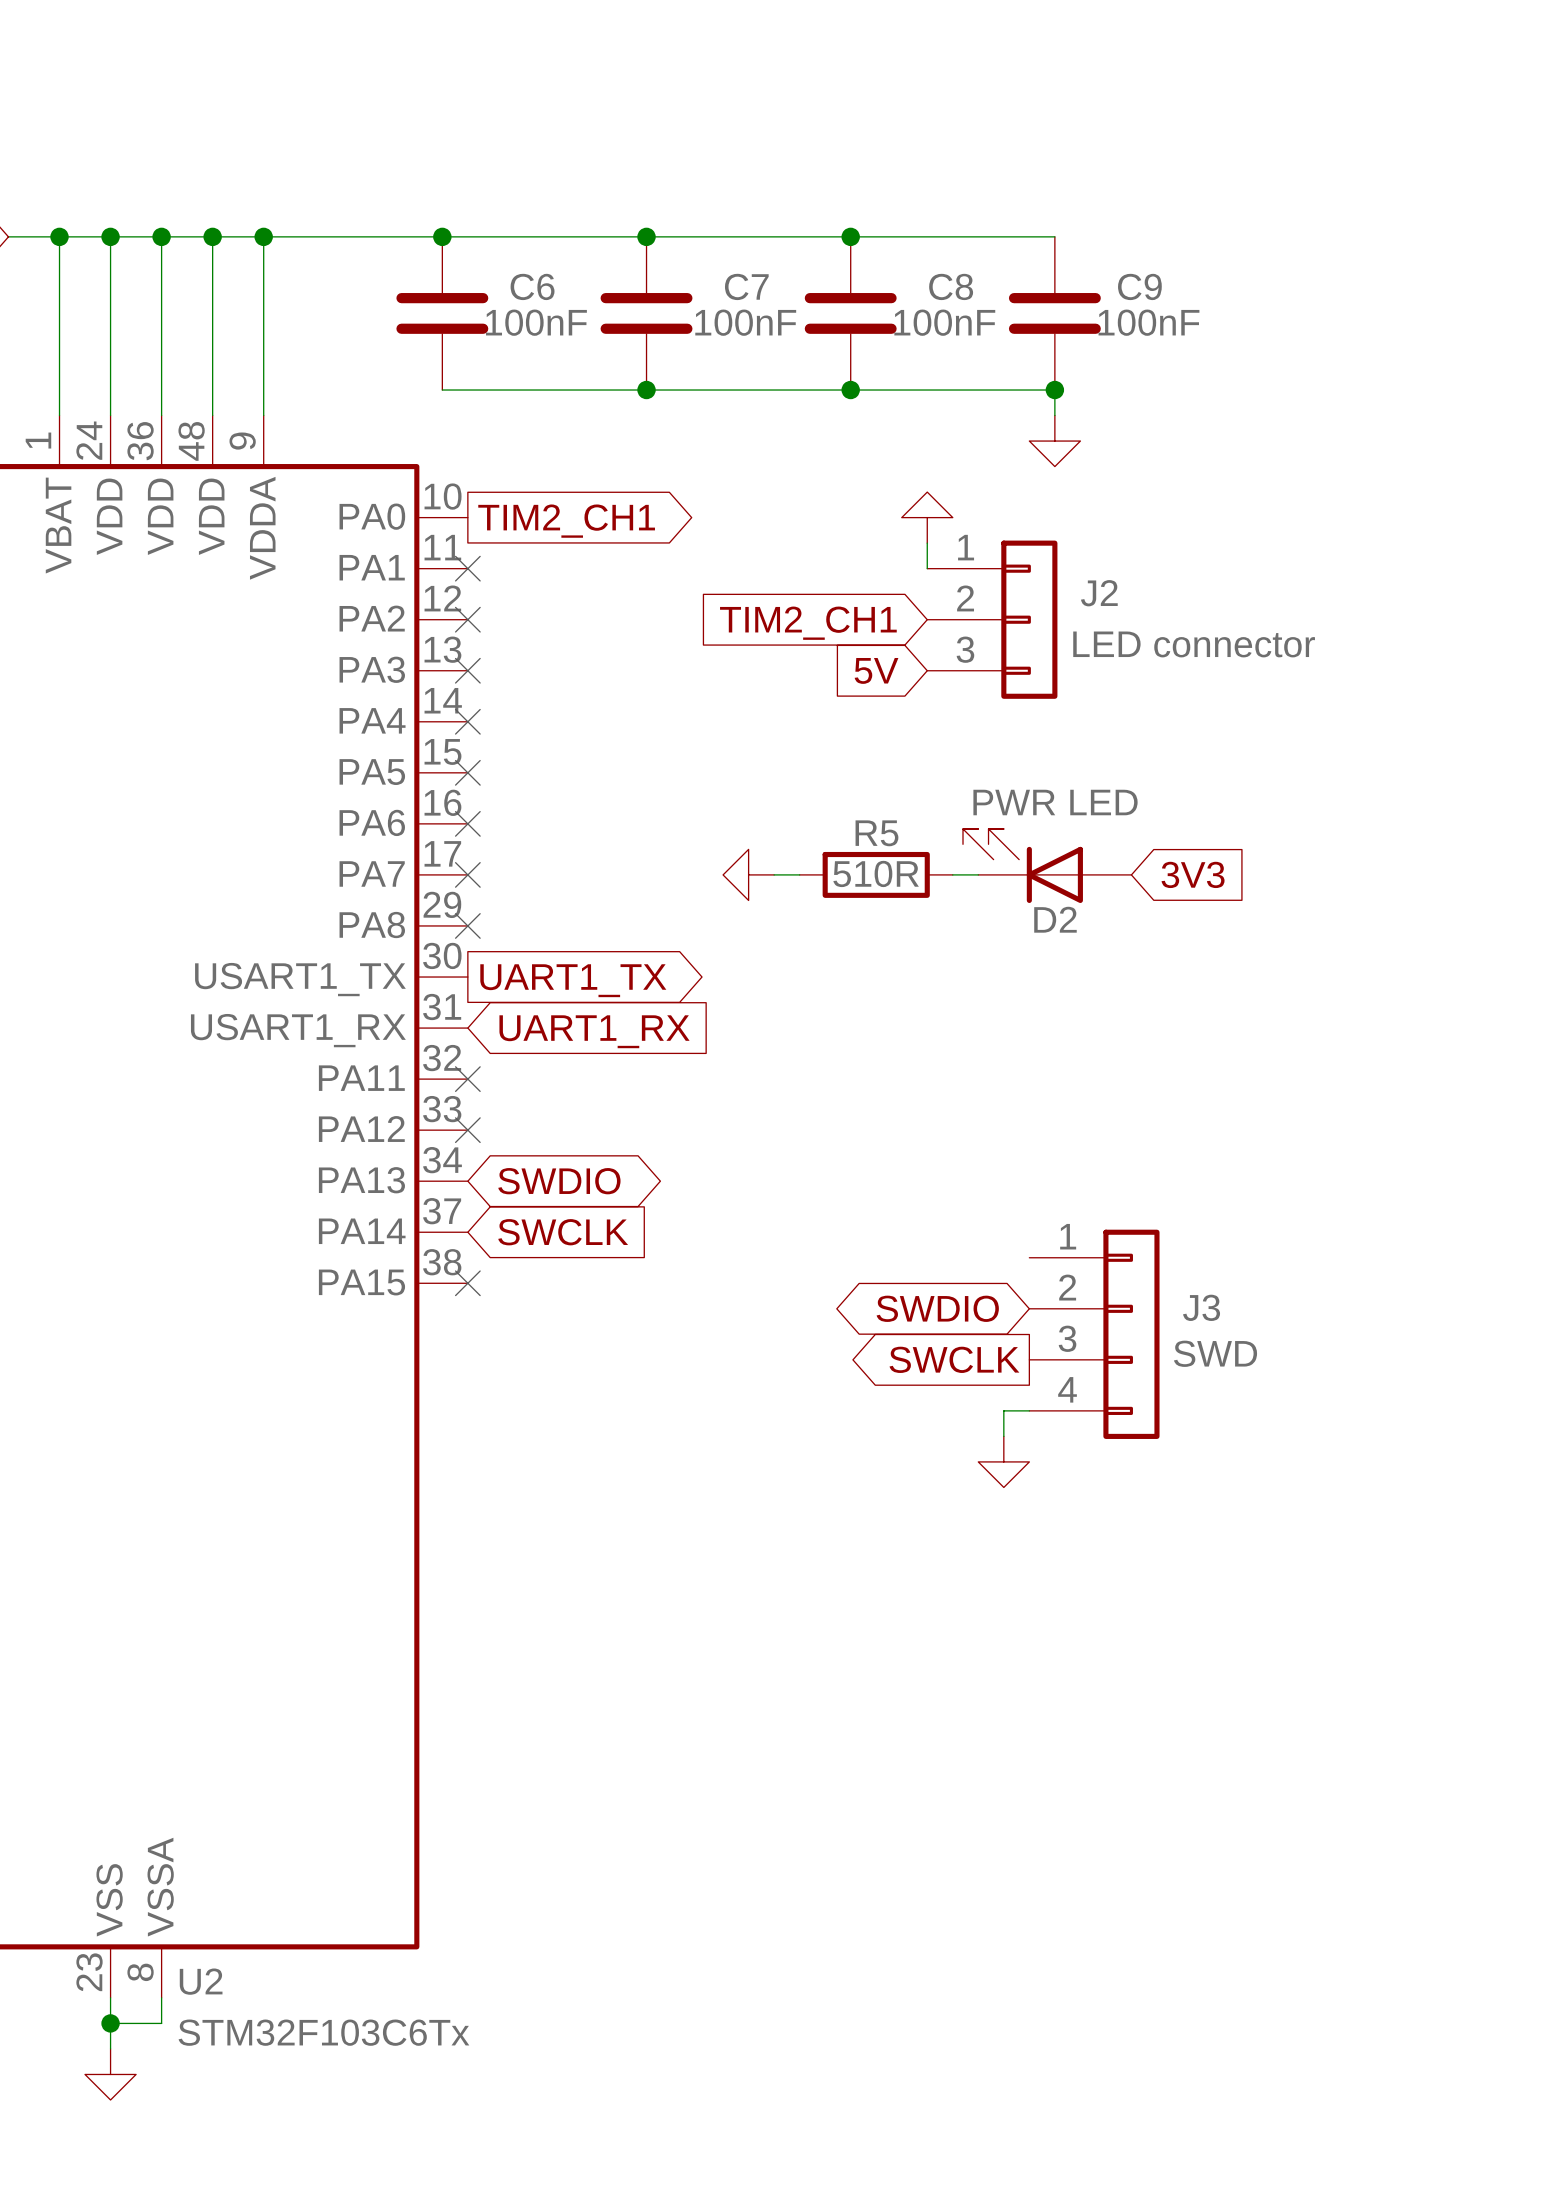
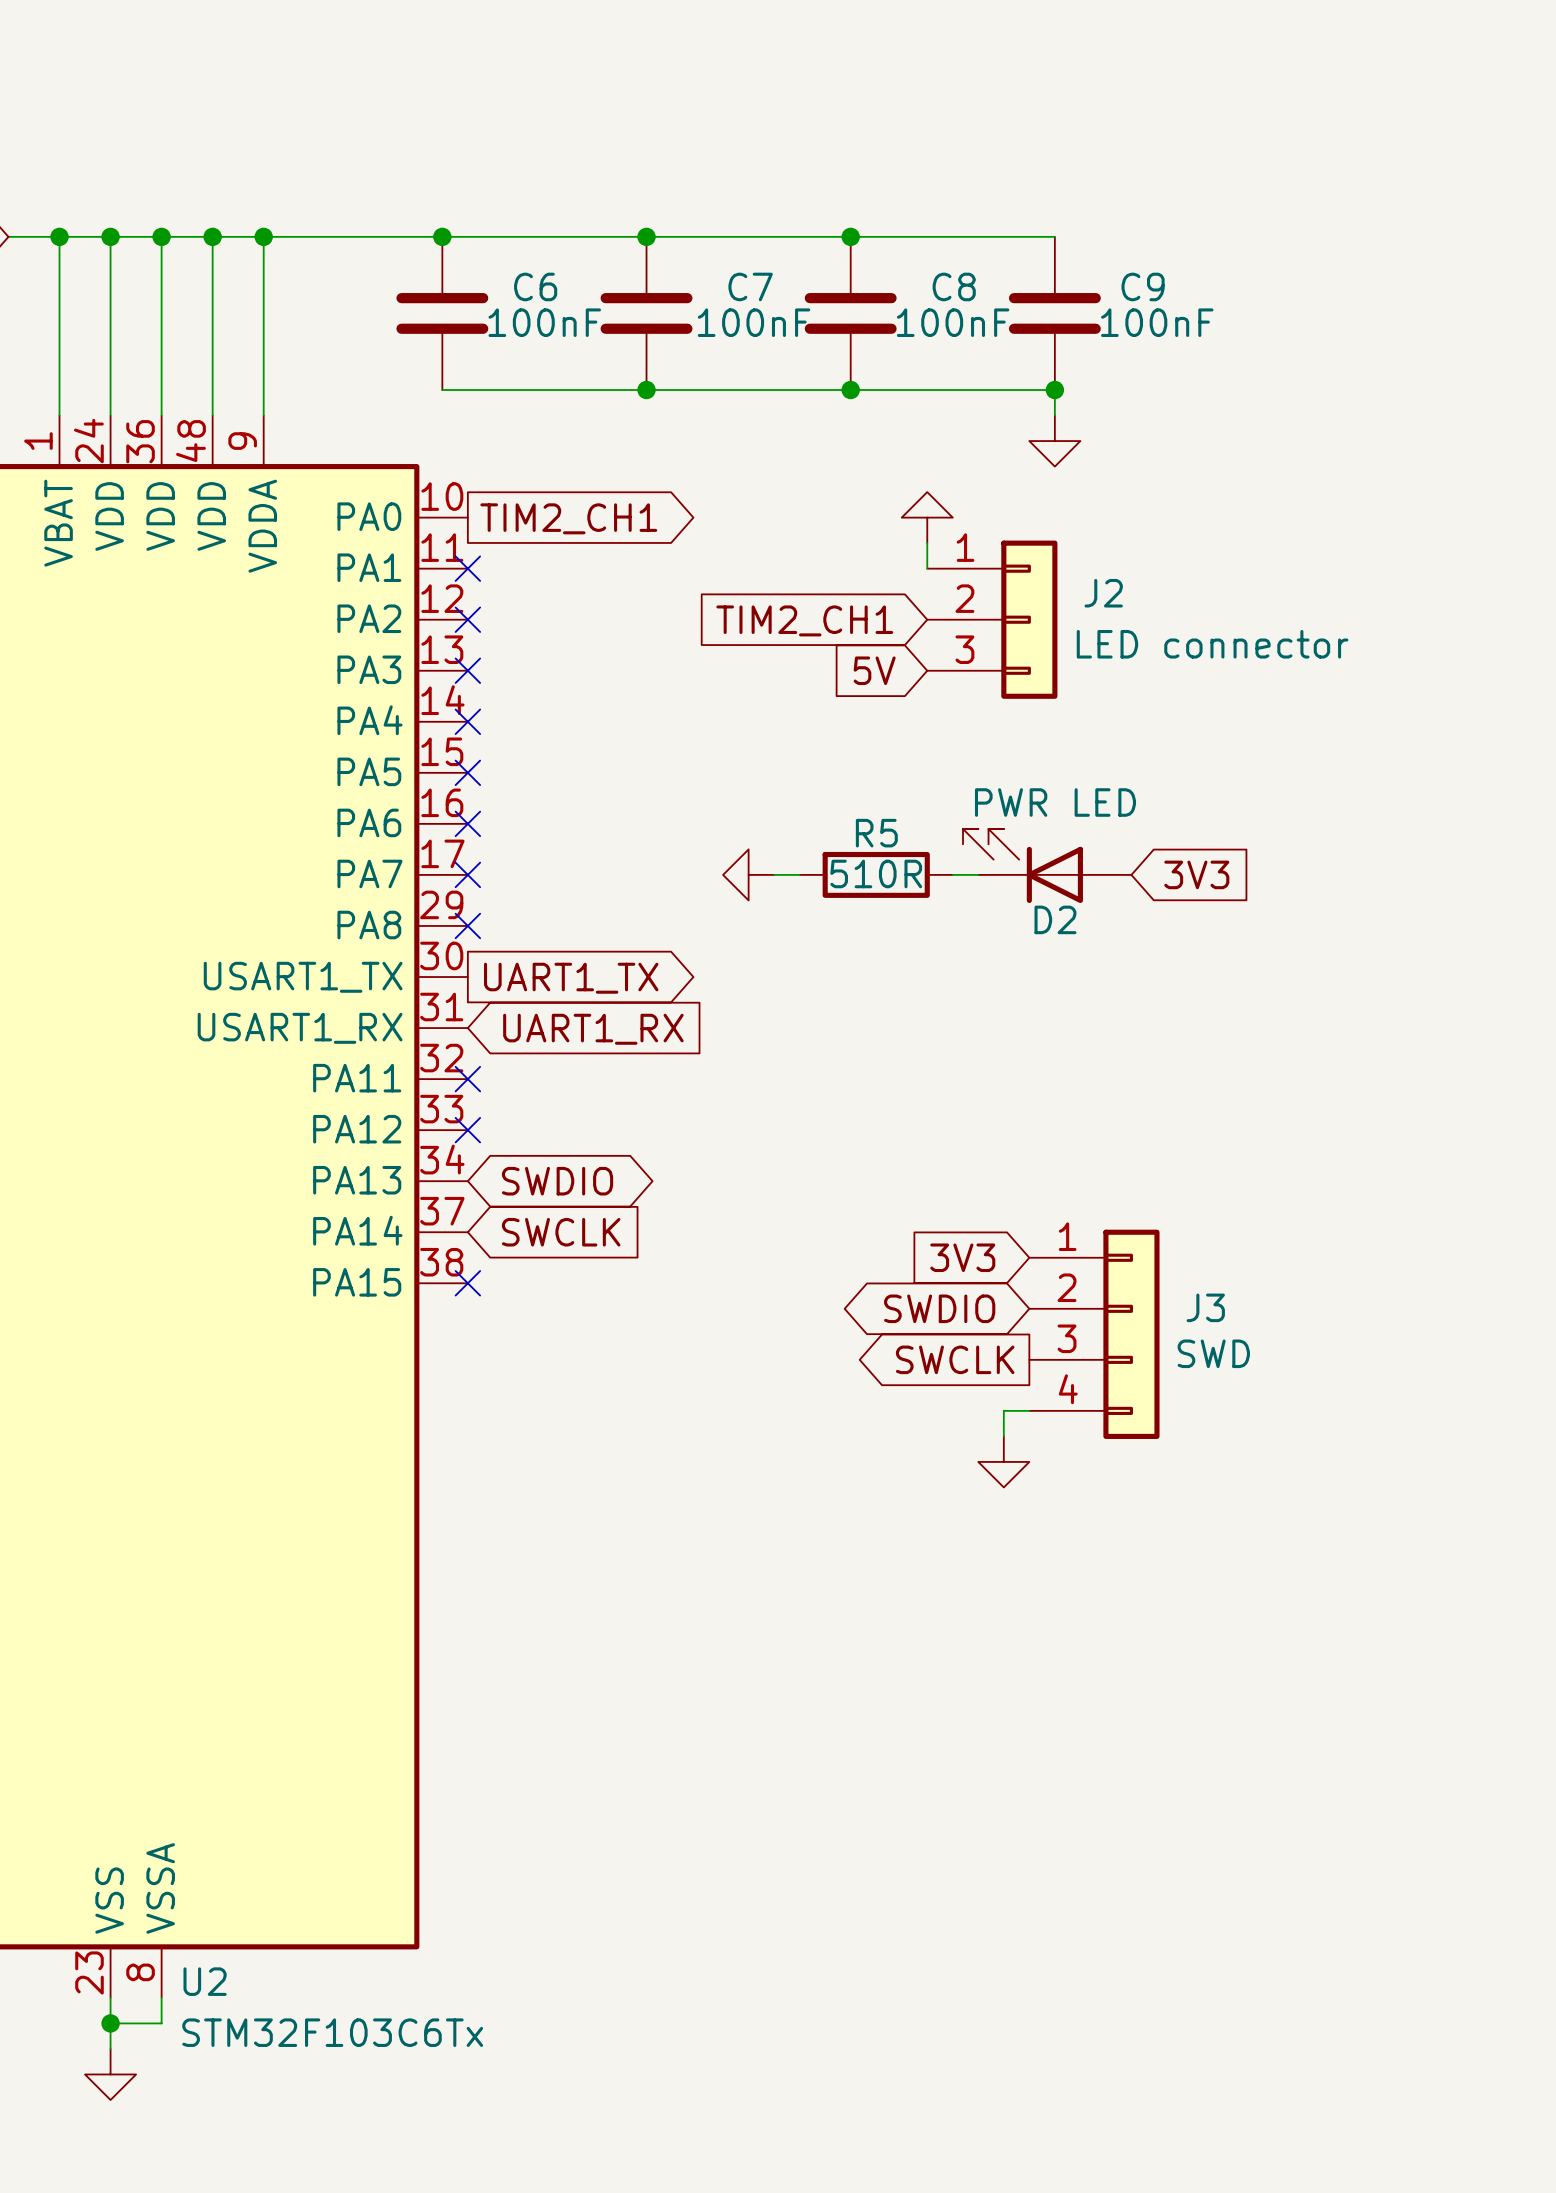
global label: none -> 3V3 (962, 1257)

